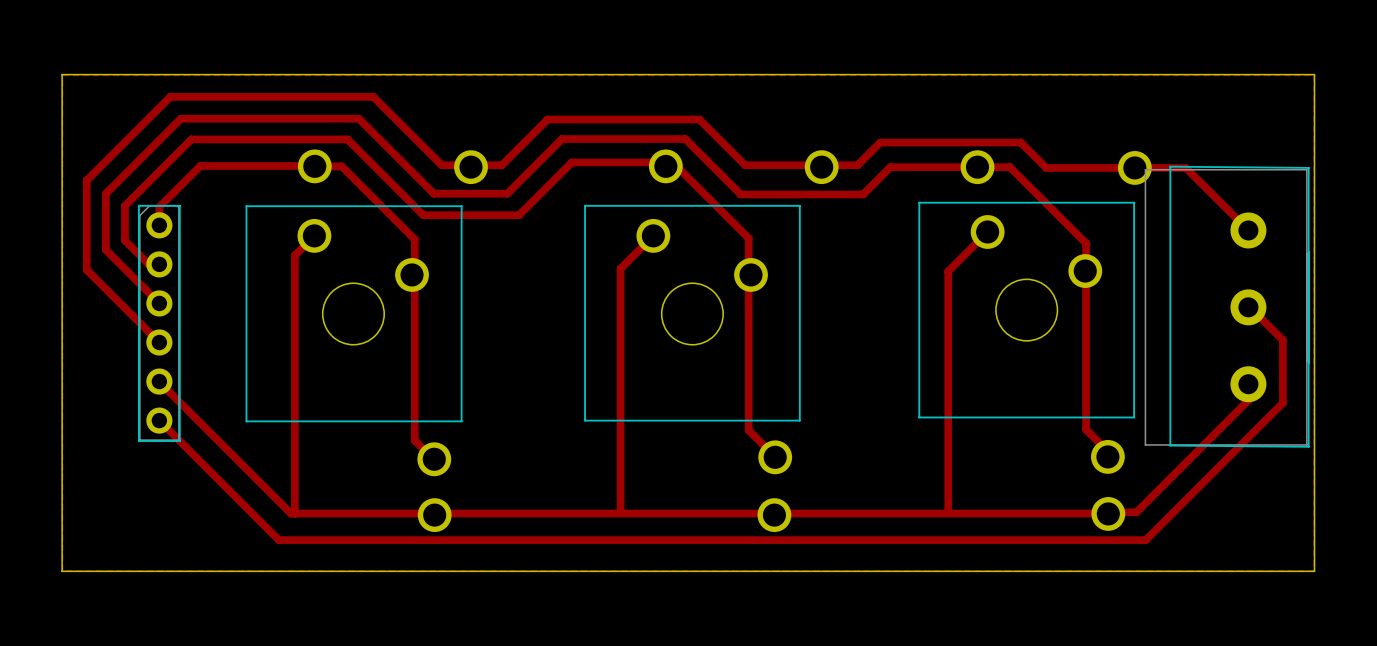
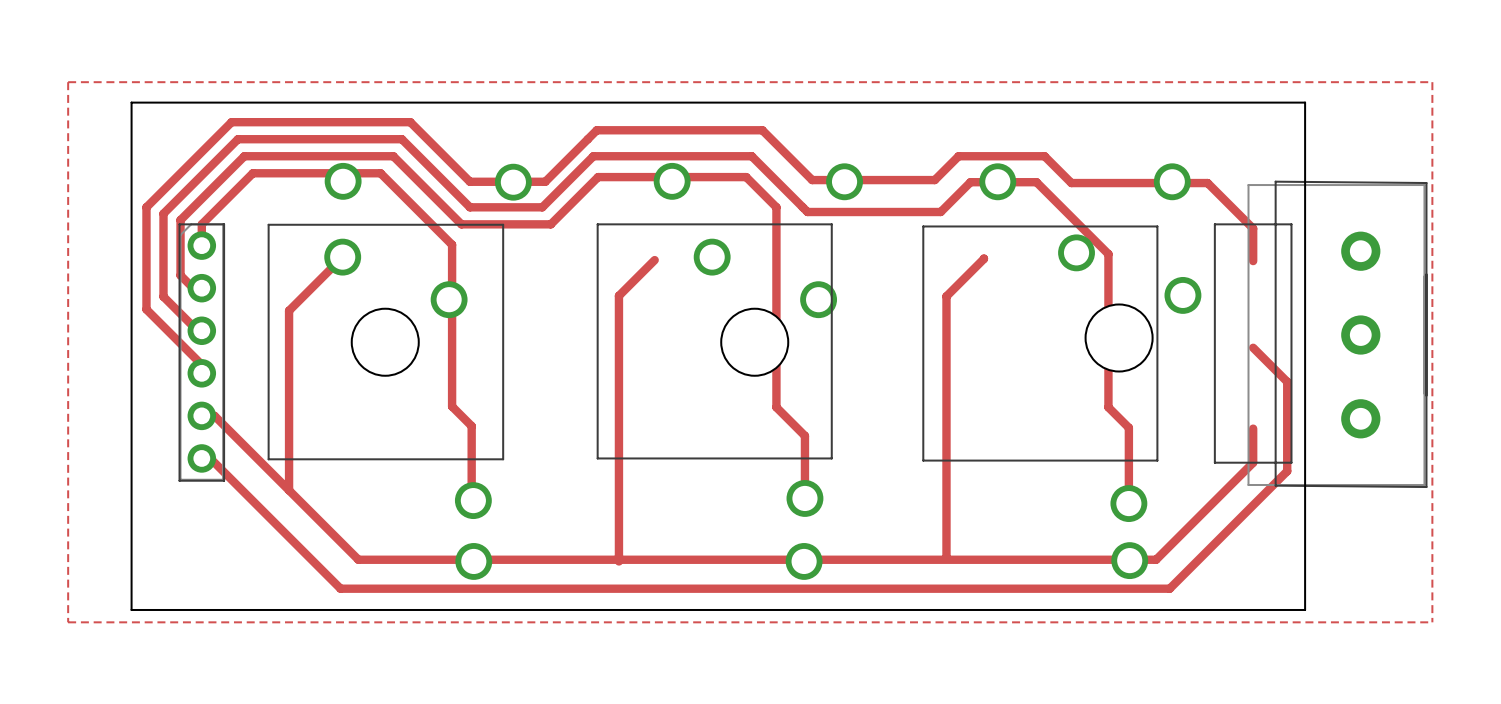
board edge: (62, 74) (1314, 74) (1314, 571) (62, 571) (62, 74) -> (131, 102) (131, 609) (1305, 609) (1305, 102) (131, 102)
track: (689, 143) (685, 139) (561, 139) (507, 193) (433, 193) (358, 118) (180, 118) (105, 193) (105, 249) (159, 303) -> (751, 156) (593, 156) (542, 207) (469, 207) (401, 139) (237, 139) (163, 213) (163, 296) (197, 330) (201, 330)
track: (879, 143) (1020, 142) (1046, 167) -> (958, 156) (1044, 156) (1071, 183) (1140, 183)
track: none -> (335, 173) (252, 173) (201, 224) (201, 245)
track: (571, 162) (519, 215) (423, 215) (347, 139) (191, 139) (125, 205) (125, 240) (148, 264) (159, 264) -> (623, 177) (598, 177) (550, 224) (461, 224) (393, 156) (244, 156) (180, 220) (180, 275) (193, 288) (201, 288)
track: (672, 162) (748, 238) (748, 430) (775, 457) -> (733, 177) (746, 177) (776, 207) (776, 407) (804, 435) (804, 498)
track: (501, 165) (441, 165) (373, 96) (170, 96) (86, 180) (86, 269) (159, 342) -> (547, 180) (545, 181) (469, 181) (410, 122) (231, 122) (146, 207) (146, 309) (201, 364) (201, 373)
part position: (665, 166) -> (672, 181)
part: none -> (844, 181)
part: none -> (997, 181)
part: none -> (1172, 181)
part: (821, 167) -> none
track: (950, 167) (1009, 167) (1086, 243) (1086, 429) (1107, 451) -> (1036, 182) (1108, 254) (1108, 407) (1128, 427) (1128, 503)
part: (977, 167) -> none
track: (1107, 167) (1185, 167) (1248, 230) -> (1207, 183) (1253, 228) (1253, 261)
part: (1134, 167) -> none
line: (919, 202) (1134, 202) (1134, 417) (919, 417) (919, 202) -> (923, 226) (1157, 226) (1157, 460) (923, 460) (923, 226)
line: (585, 205) (585, 420) -> (637, 224) (597, 224) (597, 458) (637, 458)
line: (763, 205) (799, 205) (799, 420) (763, 420) -> (831, 224) (831, 458)
line: none -> (1214, 224) (1291, 224) (1291, 462) (1214, 462) (1214, 224)
track: (159, 225) (159, 206) (200, 165) (341, 166) (414, 239) -> (351, 173) (380, 173) (452, 244) (452, 260)
track: (987, 231) (948, 271) (948, 511) -> none
track: (653, 235) (620, 268) (620, 512) -> (654, 260) (618, 295) (618, 561)
track: none -> (983, 258) (946, 296) (946, 557)
track: (294, 255) (294, 513) -> (321, 278) (289, 310) (289, 490)
track: (1248, 307) (1282, 340) (1282, 403) (1146, 539) -> none
part position: (159, 323) -> (201, 352)
track: (414, 372) (414, 440) (432, 458) -> (452, 406) (471, 426) (471, 499)
track: (159, 381) (290, 513) (328, 513) -> (201, 415) (214, 415) (358, 559)
track: (1248, 384) (1248, 400) (1136, 512) (1109, 512) -> none
track: (159, 420) (278, 540) (312, 540) -> (201, 458) (210, 458) (340, 588)
part: (1107, 456) -> none
part: none -> (804, 498)
part: (775, 457) -> none
part: none -> (1128, 503)
track: (1060, 513) (1108, 513) -> (1156, 559) (1253, 462) (1253, 428)
part: (1108, 513) -> none
part: none -> (1129, 560)
part: none -> (804, 561)
part: (774, 515) -> none
track: (1073, 540) (1145, 540) -> (1169, 588) (1287, 471) (1287, 381) (1253, 347)

